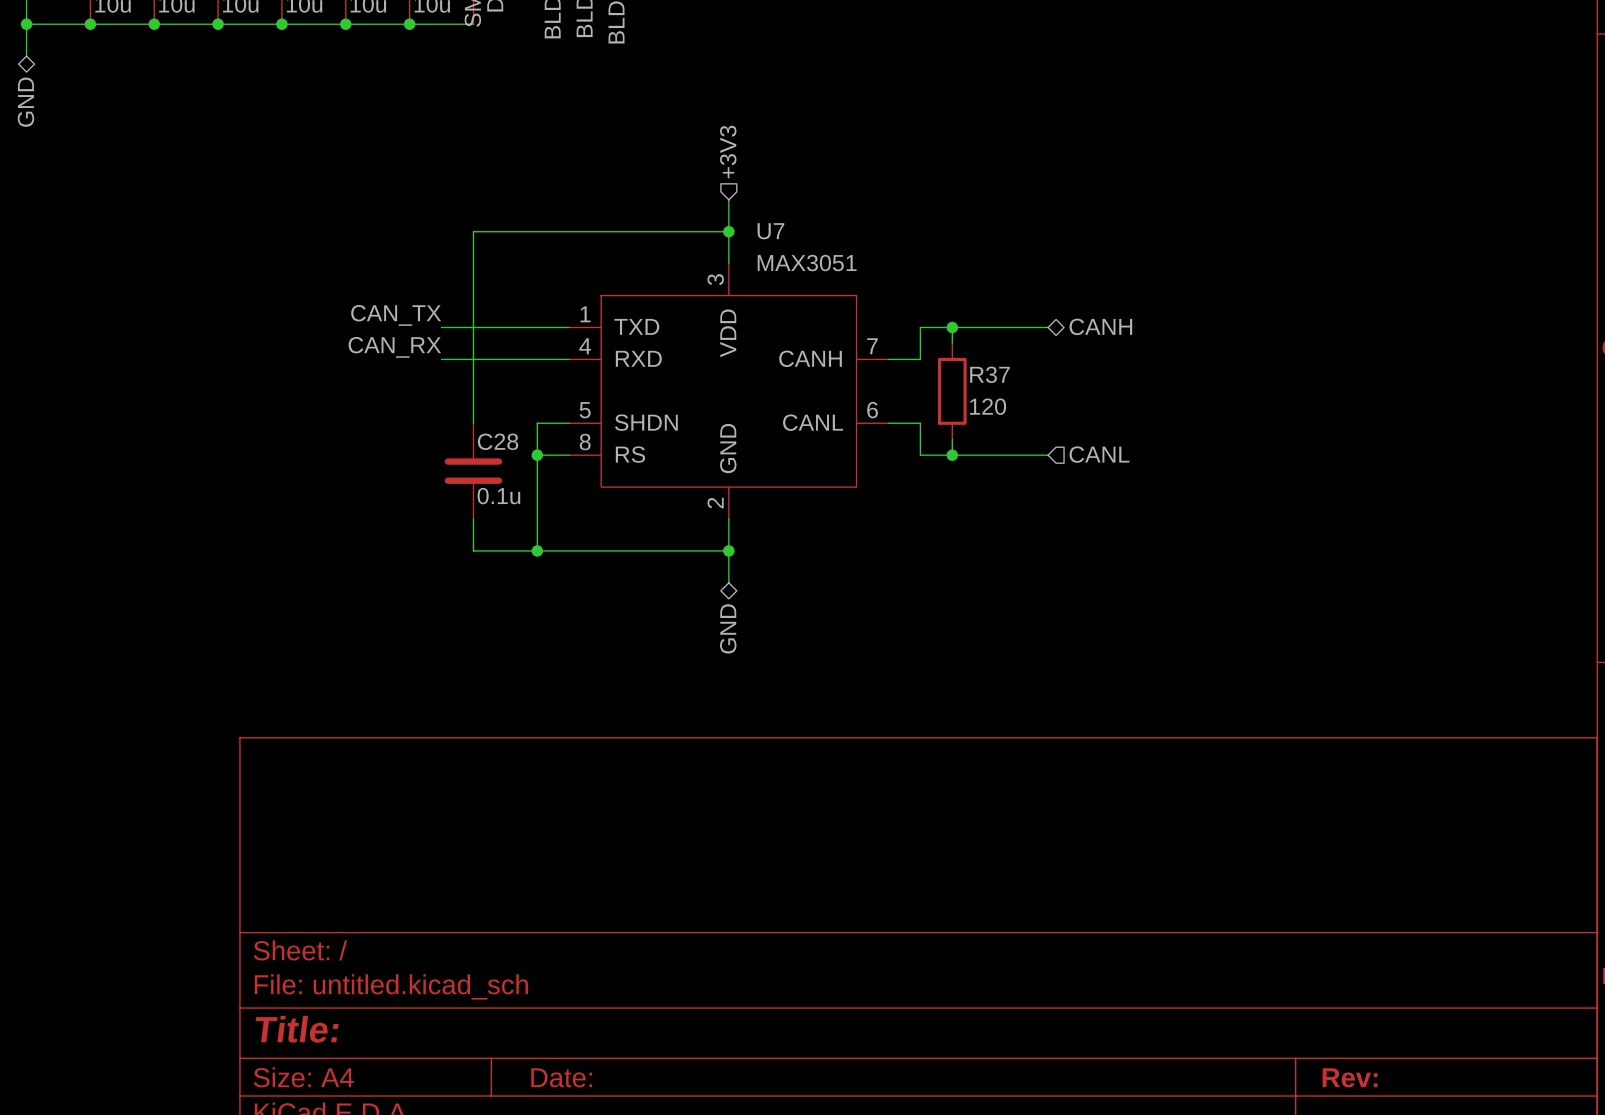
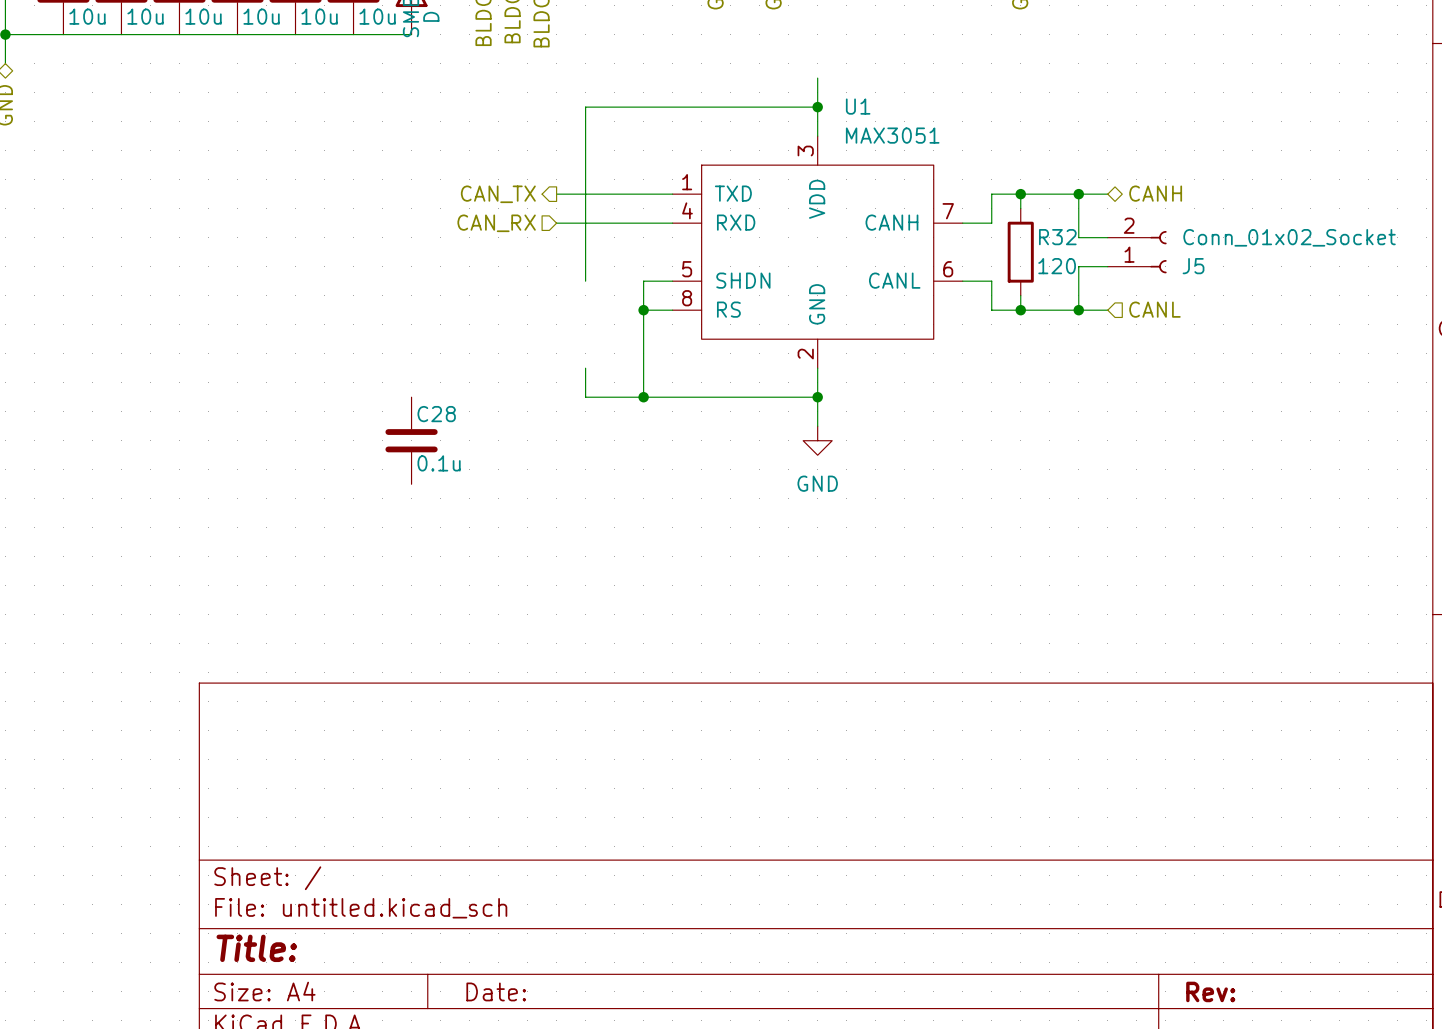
junction: (90, 24) -> none
junction: (154, 24) -> none
junction: (218, 24) -> none
junction: (281, 24) -> none
junction: (345, 24) -> none
junction: (409, 24) -> none
wire: none -> (817, 107) (585, 107) (585, 281)
junction: none -> (817, 107)
hierarchical label: +3V3 (728, 152) -> none
wire: (728, 199) (728, 263) -> (817, 78) (817, 136)
junction: none -> (1020, 194)
wire: none -> (1078, 194) (1078, 237) (1107, 237)
junction: none -> (1078, 194)
hierarchical label: none -> CAN_TX (498, 194)
wire: (633, 231) (473, 231) (473, 423) -> none
wire: none -> (643, 223) (672, 223)
junction: (728, 231) -> none
hierarchical label: none -> CAN_RX (496, 223)
U1: none -> MAX3051 (817, 252)
R32: none -> 120 (1020, 252)
J5: none -> Conn_01x02_Socket (1137, 252)
wire: none -> (1107, 266) (1078, 266) (1078, 310)
wire: none -> (962, 281) (991, 281) (991, 310) (1107, 310)
label: CAN_TX (396, 315) -> none
hierarchical label position: CANH (1100, 326) -> CANH (1155, 193)
wire: (441, 327) (569, 327) -> (556, 194) (672, 194)
junction: none -> (643, 310)
wire: (952, 327) (952, 343) -> (1020, 194) (1020, 208)
junction: (952, 327) -> none
wire: (1048, 327) (920, 327) (920, 359) (888, 359) -> (1107, 194) (991, 194) (991, 223) (962, 223)
junction: none -> (1020, 310)
junction: none -> (1078, 310)
label: CAN_RX (394, 347) -> none
wire: (441, 359) (569, 359) -> none
wire: none -> (585, 368) (585, 397) (788, 397)
U7: MAX3051 (728, 391) -> none
wire: none -> (817, 368) (817, 397)
R37: 120 (952, 391) -> none
wire: (569, 423) (537, 423) (537, 550) -> (672, 281) (643, 281) (643, 397)
junction: none -> (643, 397)
wire: (952, 439) (952, 455) -> (1020, 295) (1020, 310)
hierarchical label position: CANL (1099, 454) -> CANL (1154, 309)
wire: (537, 455) (569, 455) -> (643, 310) (672, 310)
junction: (537, 455) -> none
wire: (920, 455) (1048, 455) -> none
junction position: (952, 455) -> (817, 397)
power symbol: none -> GND (817, 440)
wire: (473, 519) (473, 550) (728, 550) -> none
wire: (728, 519) (728, 582) -> none
junction: (537, 550) -> none
junction: (728, 550) -> none
hierarchical label: GND (728, 628) -> none

